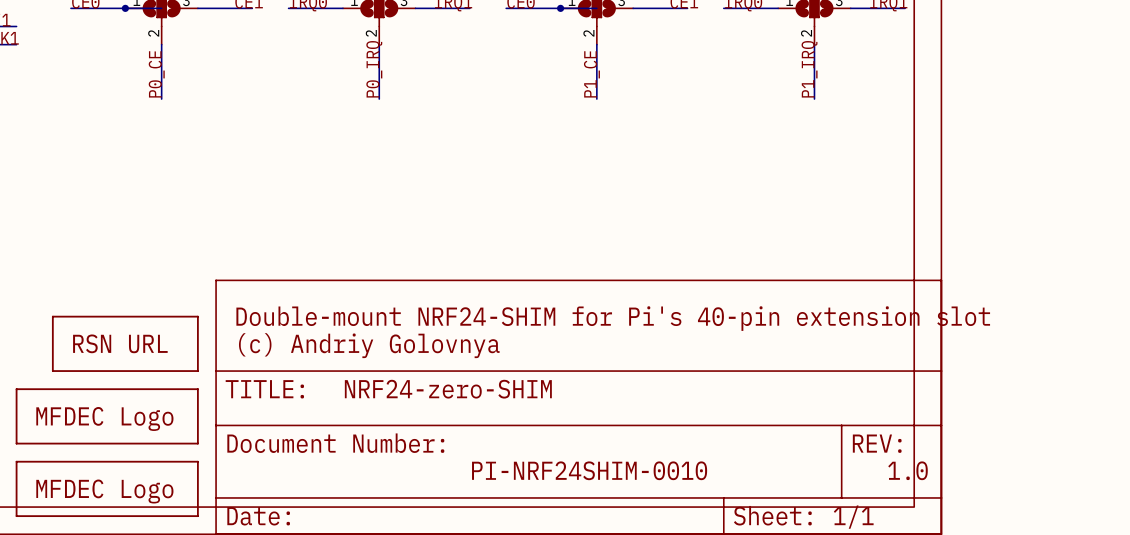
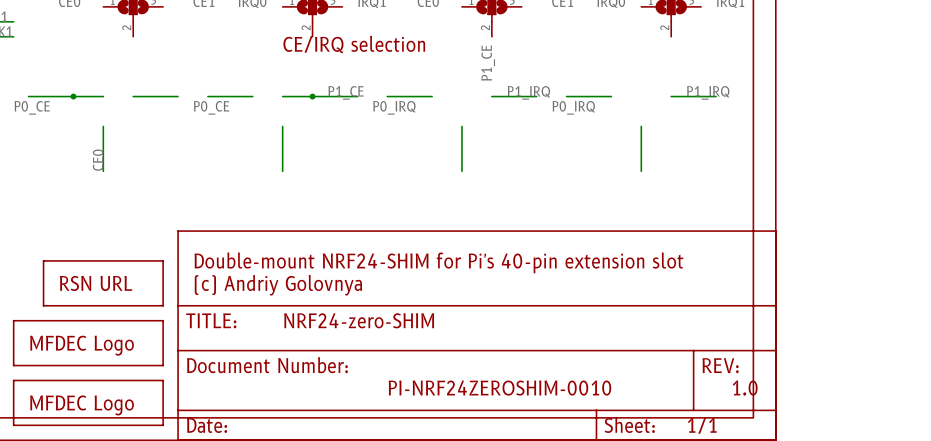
wire: (70, 8) (161, 8) -> (28, 96) (103, 96)
junction: (125, 8) -> none
wire: (197, 8) (252, 8) -> (133, 96) (178, 96)
wire: (288, 8) (342, 8) -> (207, 96) (252, 96)
wire: (415, 8) (469, 8) -> (387, 96) (432, 96)
wire: (506, 8) (596, 8) -> none
junction: (560, 8) -> none
wire: (633, 8) (687, 8) -> (491, 96) (536, 96)
wire: (723, 8) (778, 8) -> (566, 96) (611, 96)
wire: (850, 8) (905, 8) -> (671, 96) (716, 96)
wire: (161, 44) (161, 99) -> (103, 126) (103, 171)
wire: (379, 44) (379, 99) -> (282, 126) (282, 171)
wire: (596, 44) (596, 99) -> (461, 126) (461, 171)
wire: (814, 44) (814, 99) -> (641, 126) (641, 171)
text: none -> CE/IRQ selection (354, 44)
label rotation: 0° (374, 69) -> 90° clockwise (394, 107)
label position: P0_IRQ (374, 69) -> P0_IRQ (394, 107)
label rotation: 0° (809, 69) -> 90° clockwise (708, 92)
label position: P1_IRQ (809, 69) -> P1_IRQ (708, 92)
label: P0_CE (156, 74) -> none
label: none -> P1_CE (346, 92)
label: none -> P1_IRQ (528, 92)
junction: none -> (73, 96)
wire: none -> (282, 96) (357, 96)
junction: none -> (312, 96)
label: none -> P0_CE (32, 107)
label: none -> P0_CE (211, 107)
label: none -> P0_IRQ (573, 107)
label: none -> CE0 (98, 160)
text: PI-NRF24SHIM-0010 (589, 470) -> PI-NRF24ZEROSHIM-0010 (499, 388)

